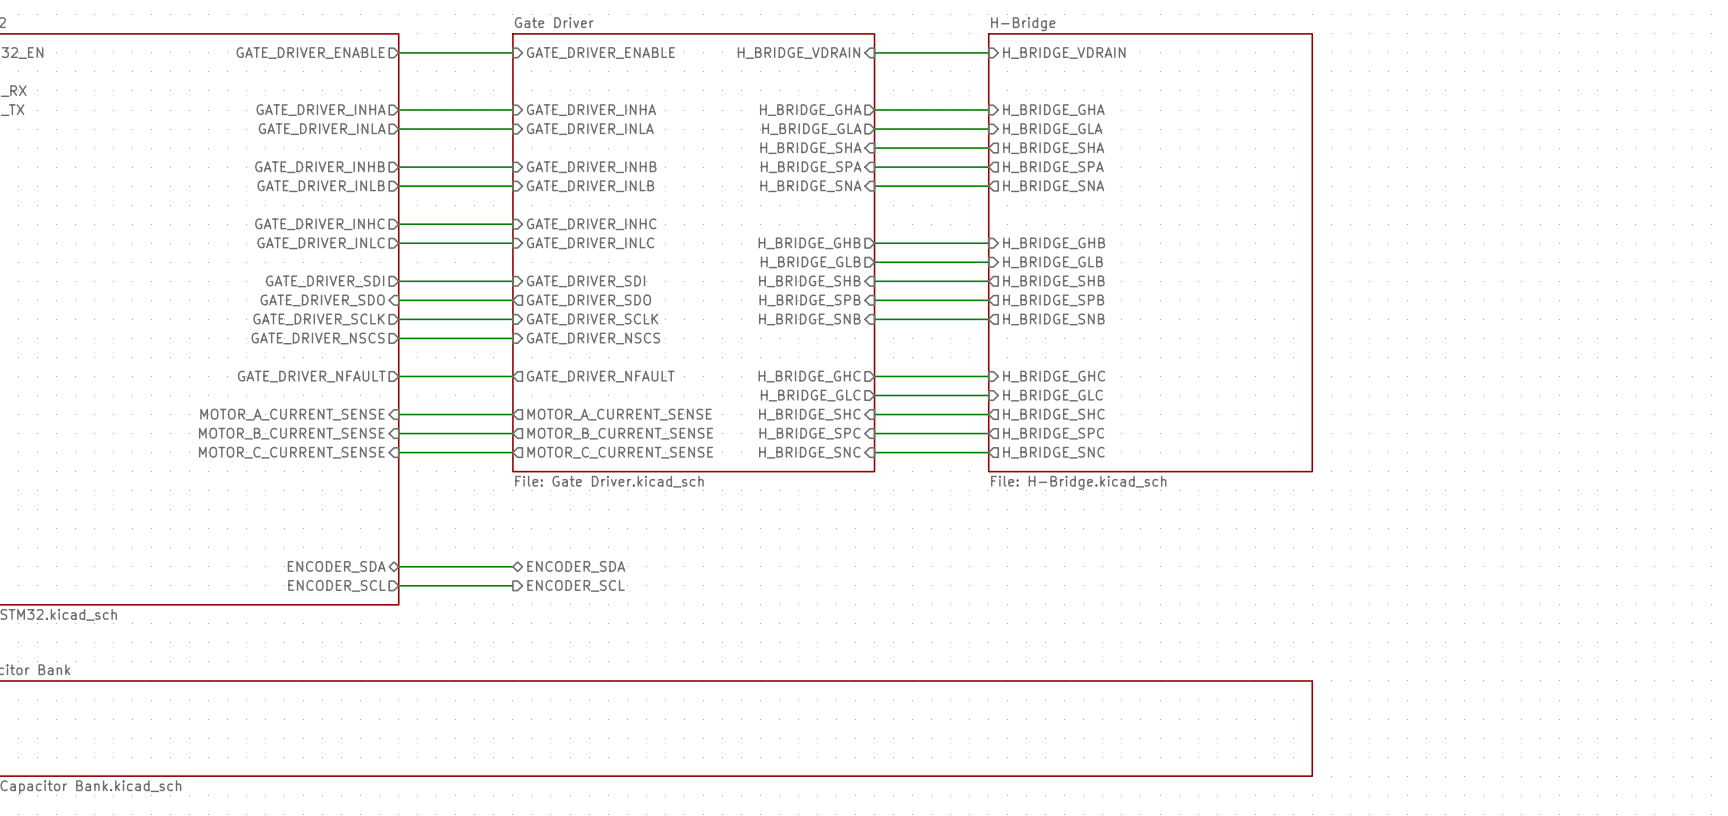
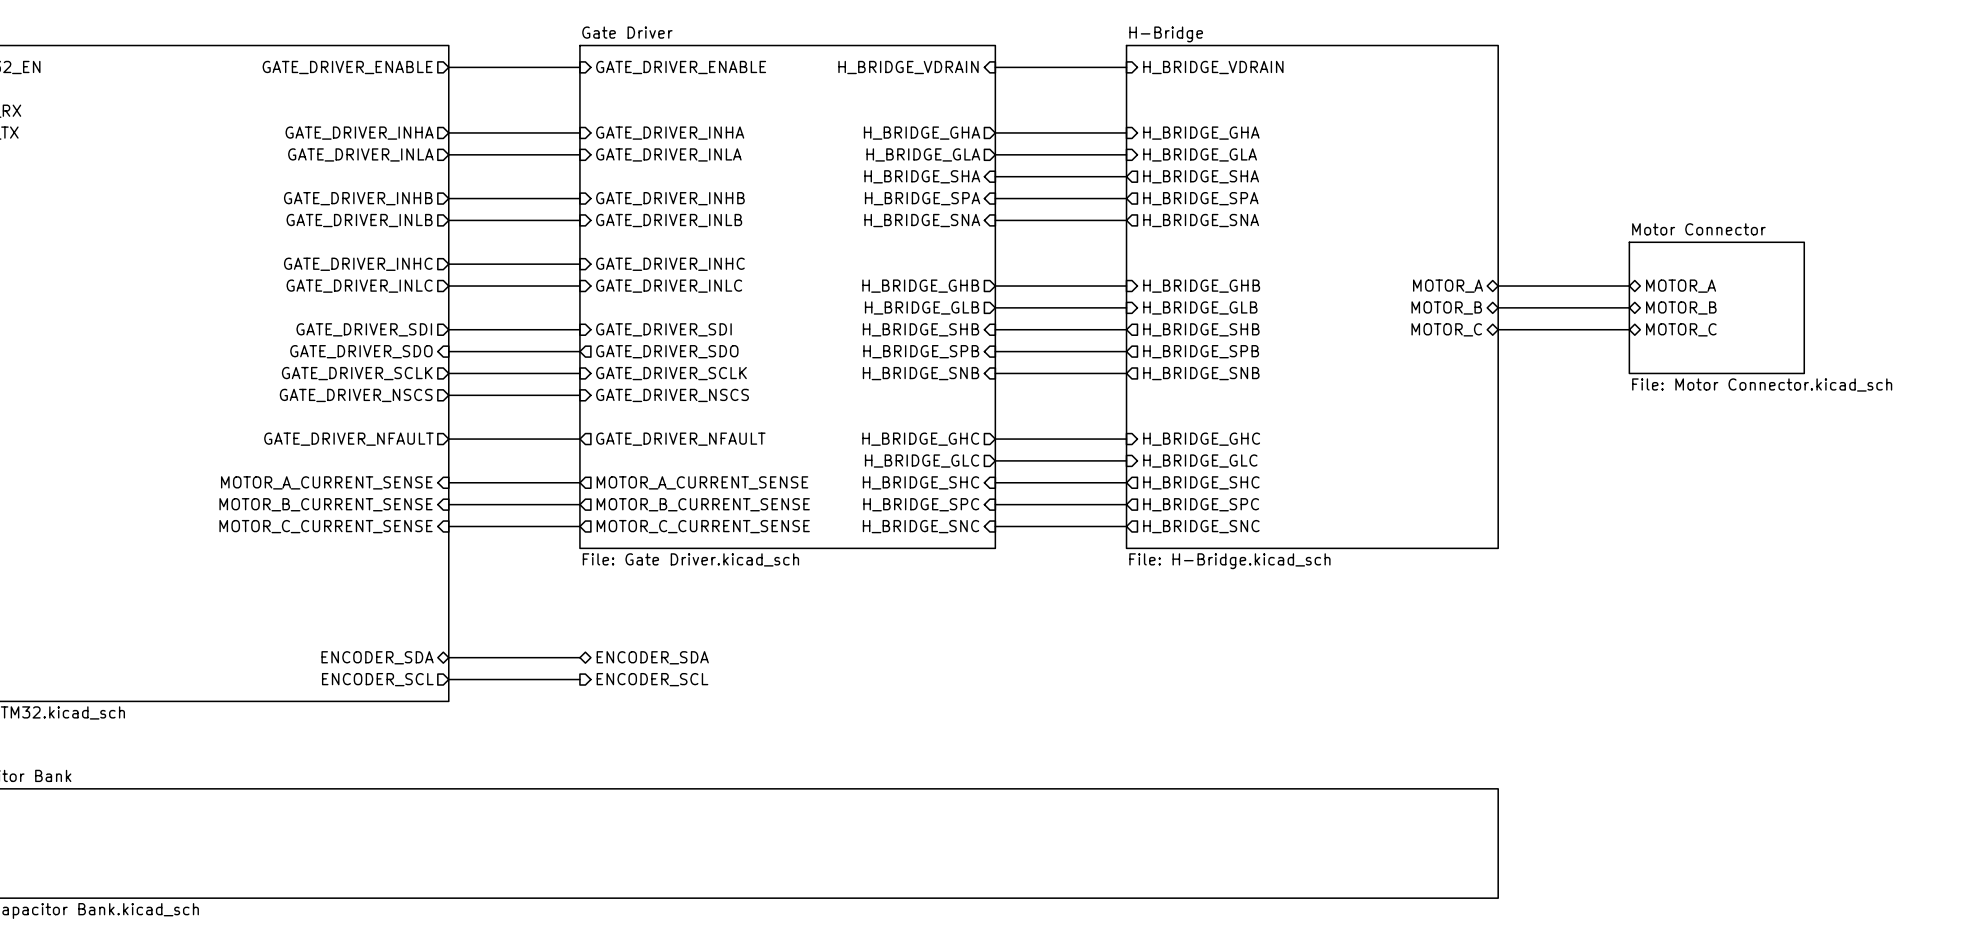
sheet pin: none -> MOTOR_A (1448, 286)
wire: none -> (1498, 286) (1629, 286)
sheet pin: none -> MOTOR_A (1681, 286)
sheet pin: none -> MOTOR_B (1446, 307)
wire: none -> (1498, 307) (1629, 307)
sheet pin: none -> MOTOR_B (1681, 307)
sheet Motor Connector: none -> File: Motor Connector.kicad_sch (1716, 307)
sheet pin: none -> MOTOR_C (1446, 329)
wire: none -> (1498, 329) (1629, 329)
sheet pin: none -> MOTOR_C (1681, 329)

